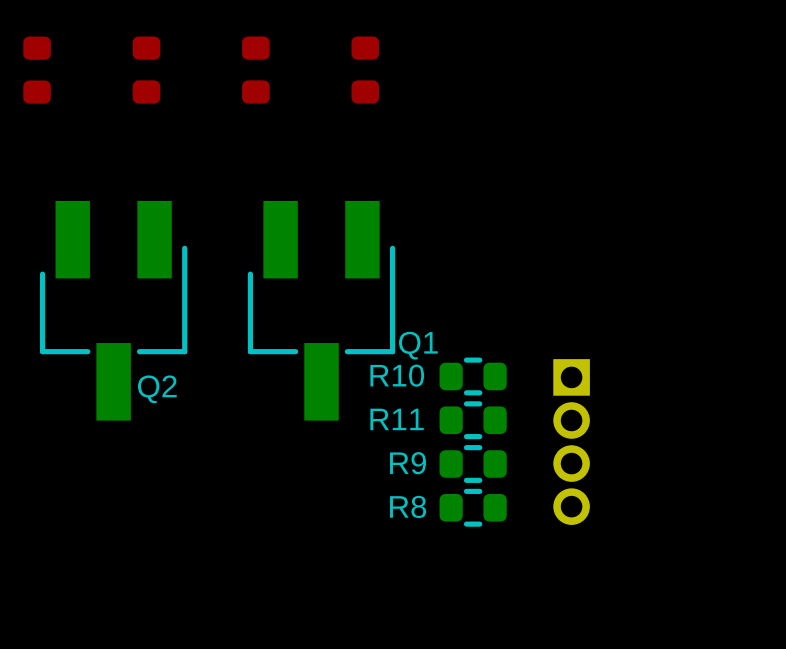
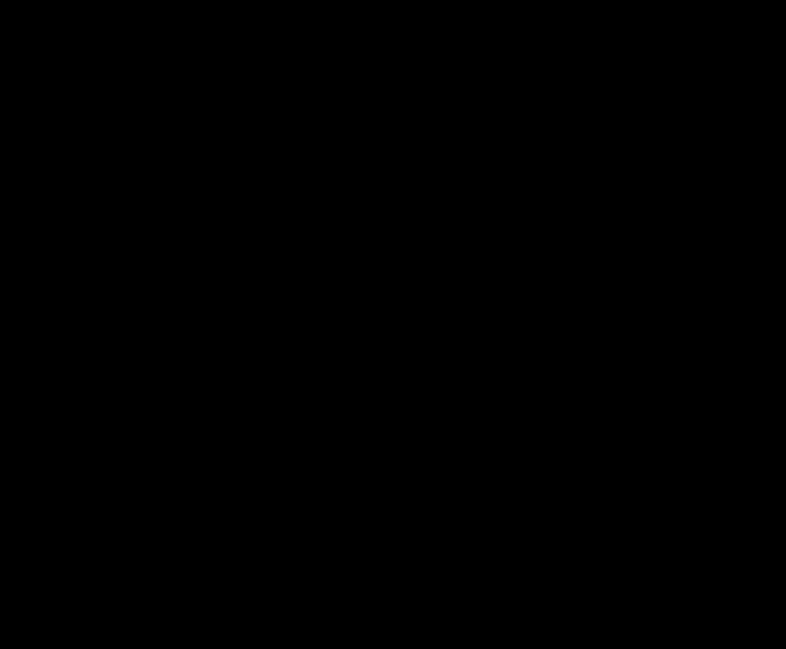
part: (37, 70) -> none
part: (146, 70) -> none
part: (255, 70) -> none
part: (365, 70) -> none
Q2: (113, 310) -> none
Q1: (321, 310) -> none
R10: (473, 376) -> none
R11: (473, 420) -> none
part: (571, 442) -> none
R9: (473, 463) -> none
R8: (473, 507) -> none

